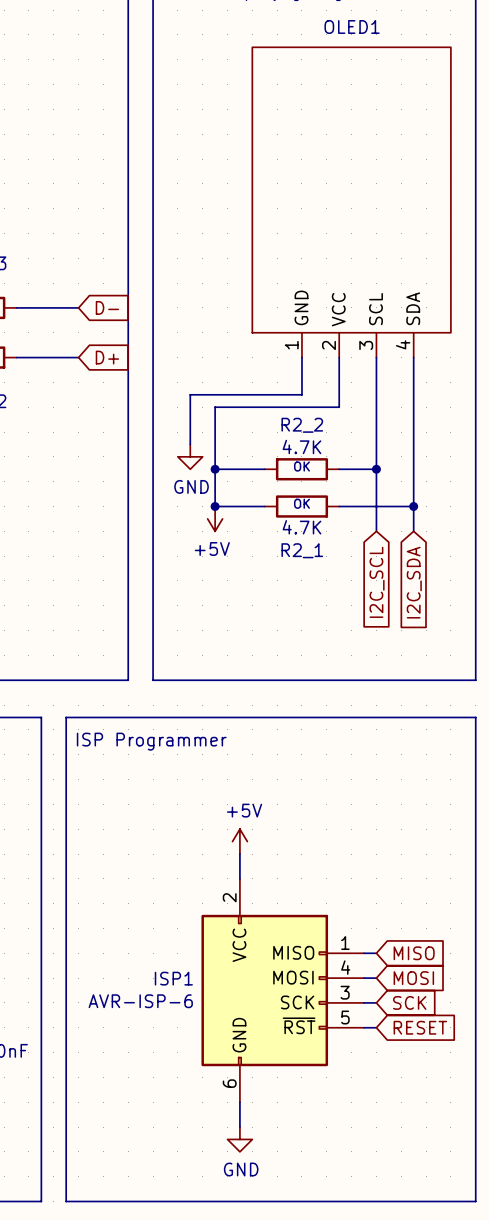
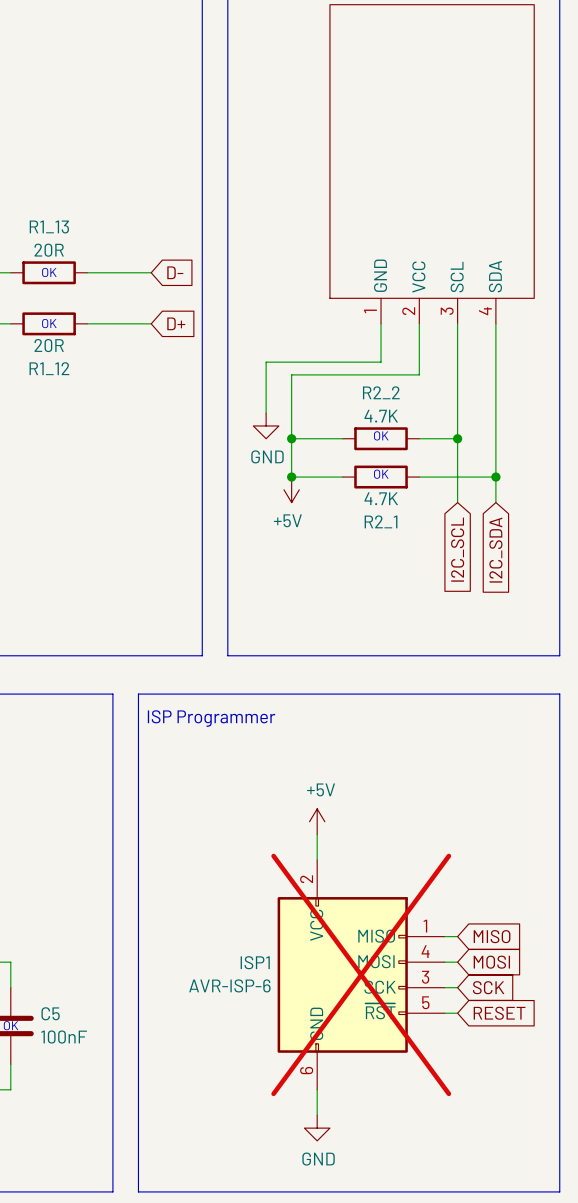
ISP1 do-not-place cross: none -> (361, 974)

